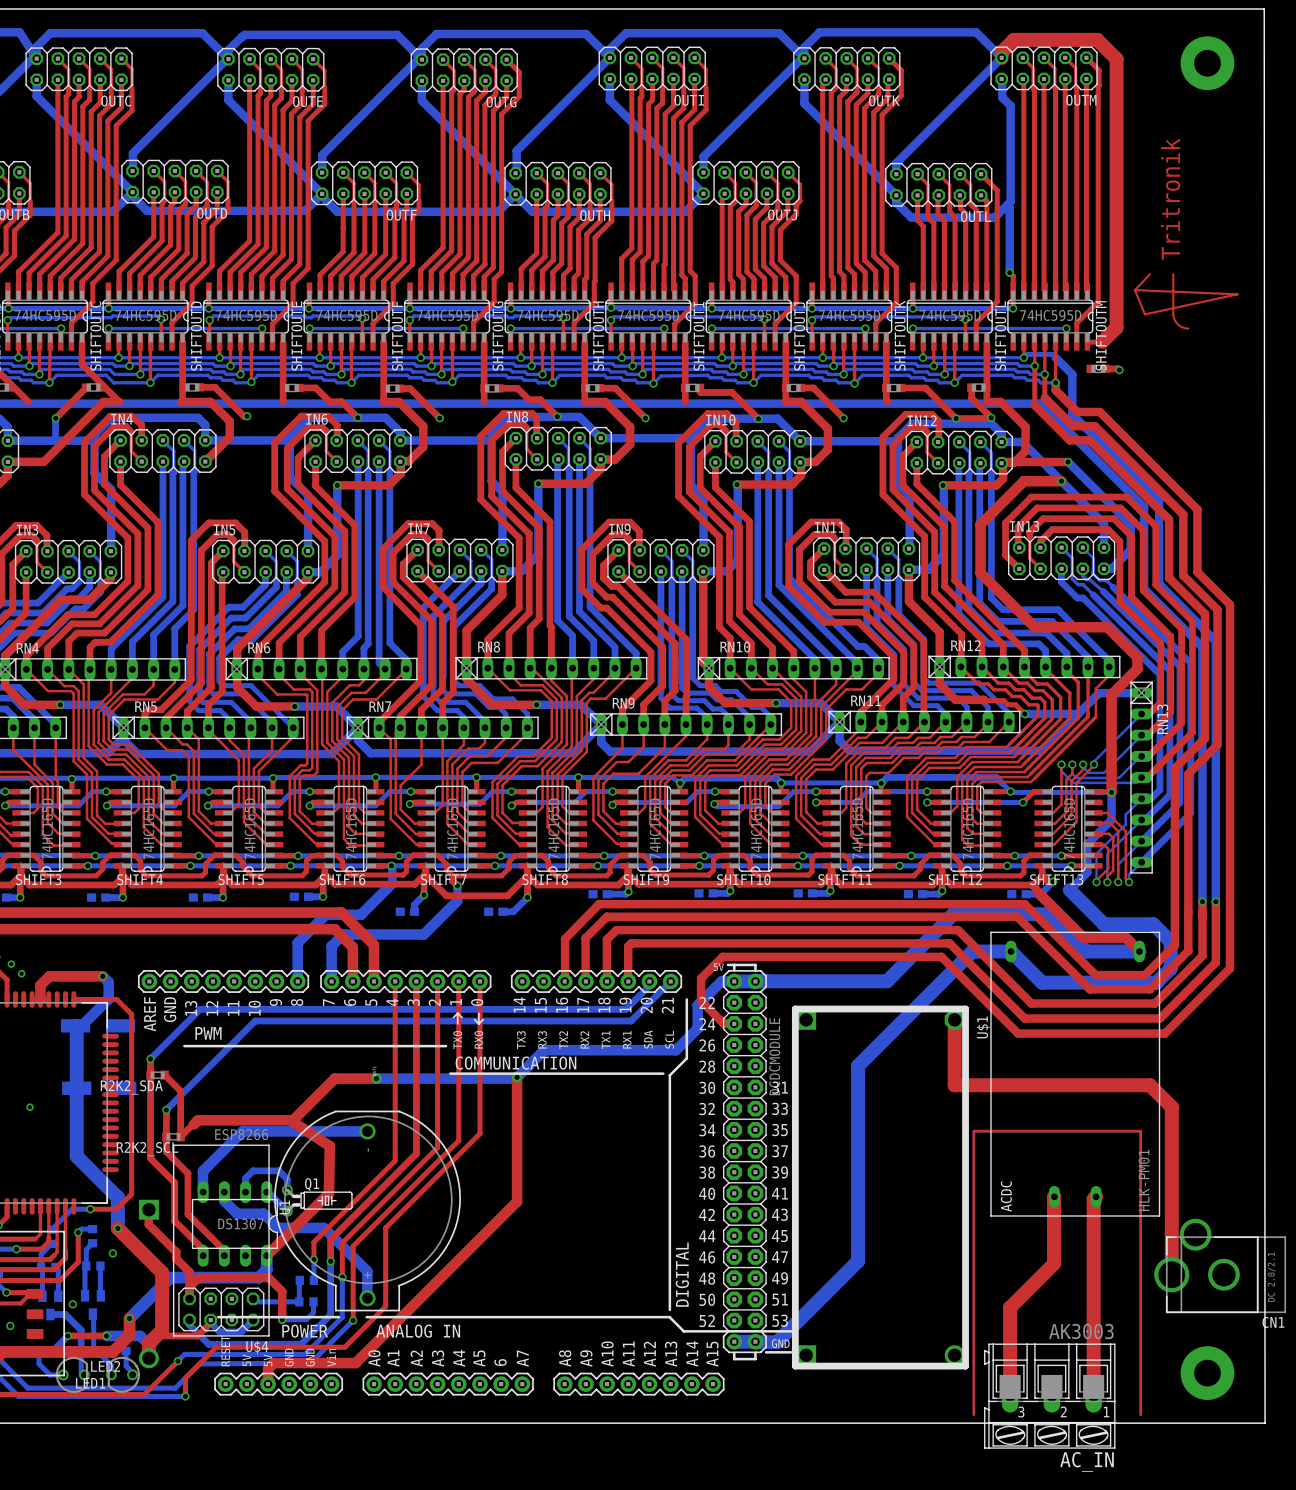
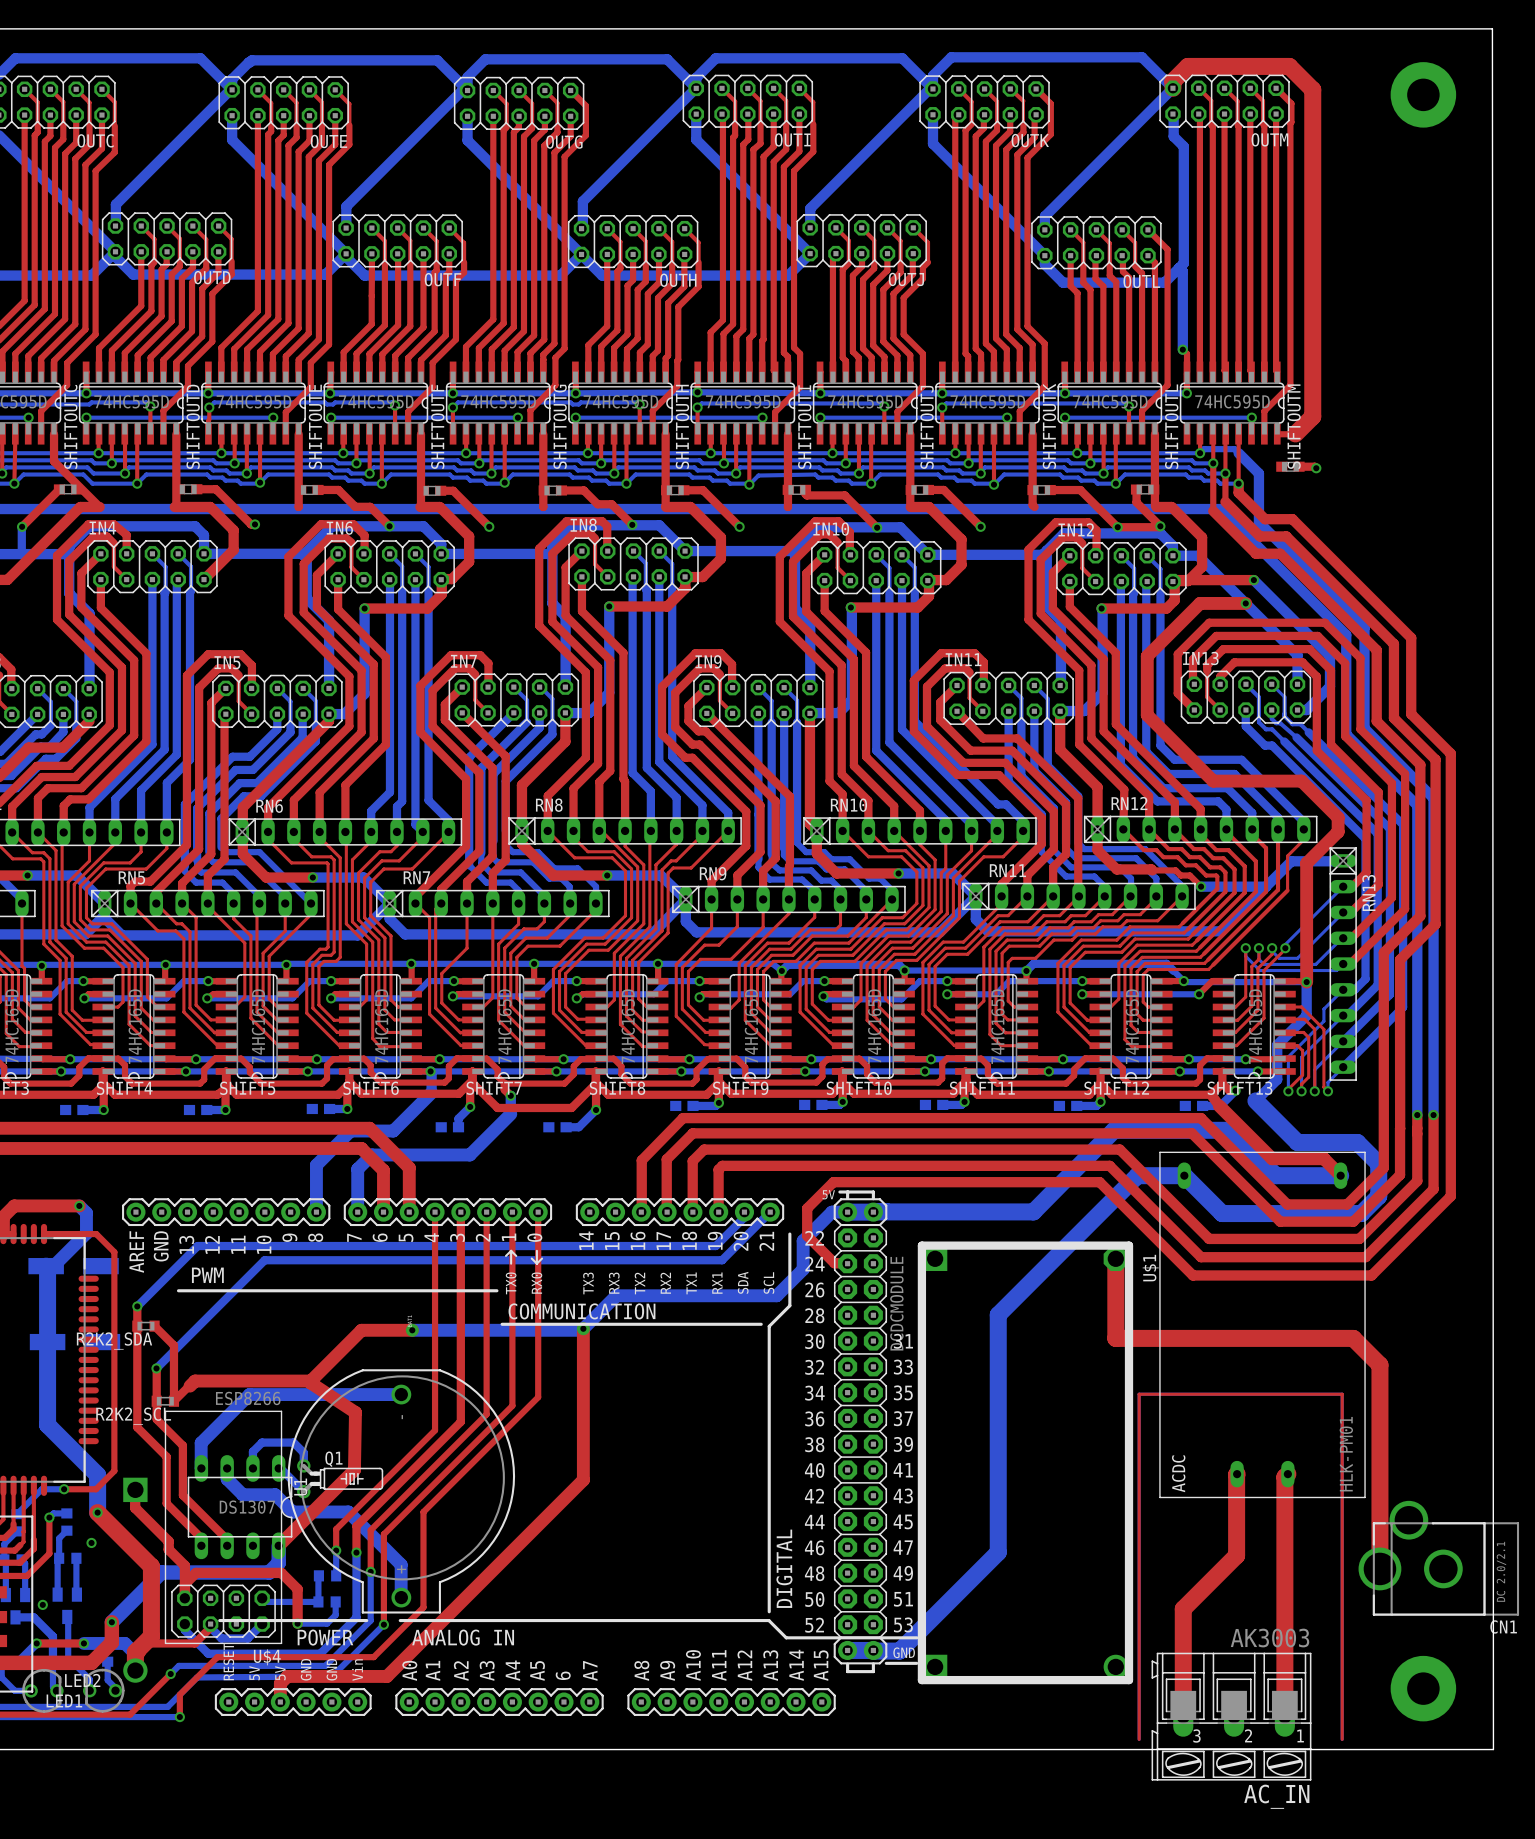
text: Tritronik (1170, 199) -> none
top track: (1149, 274) (1134, 290) (1144, 314) (1237, 294) (1136, 290) -> none
top track: (1173, 274) (1173, 317) (1179, 325) (1188, 328) -> none

